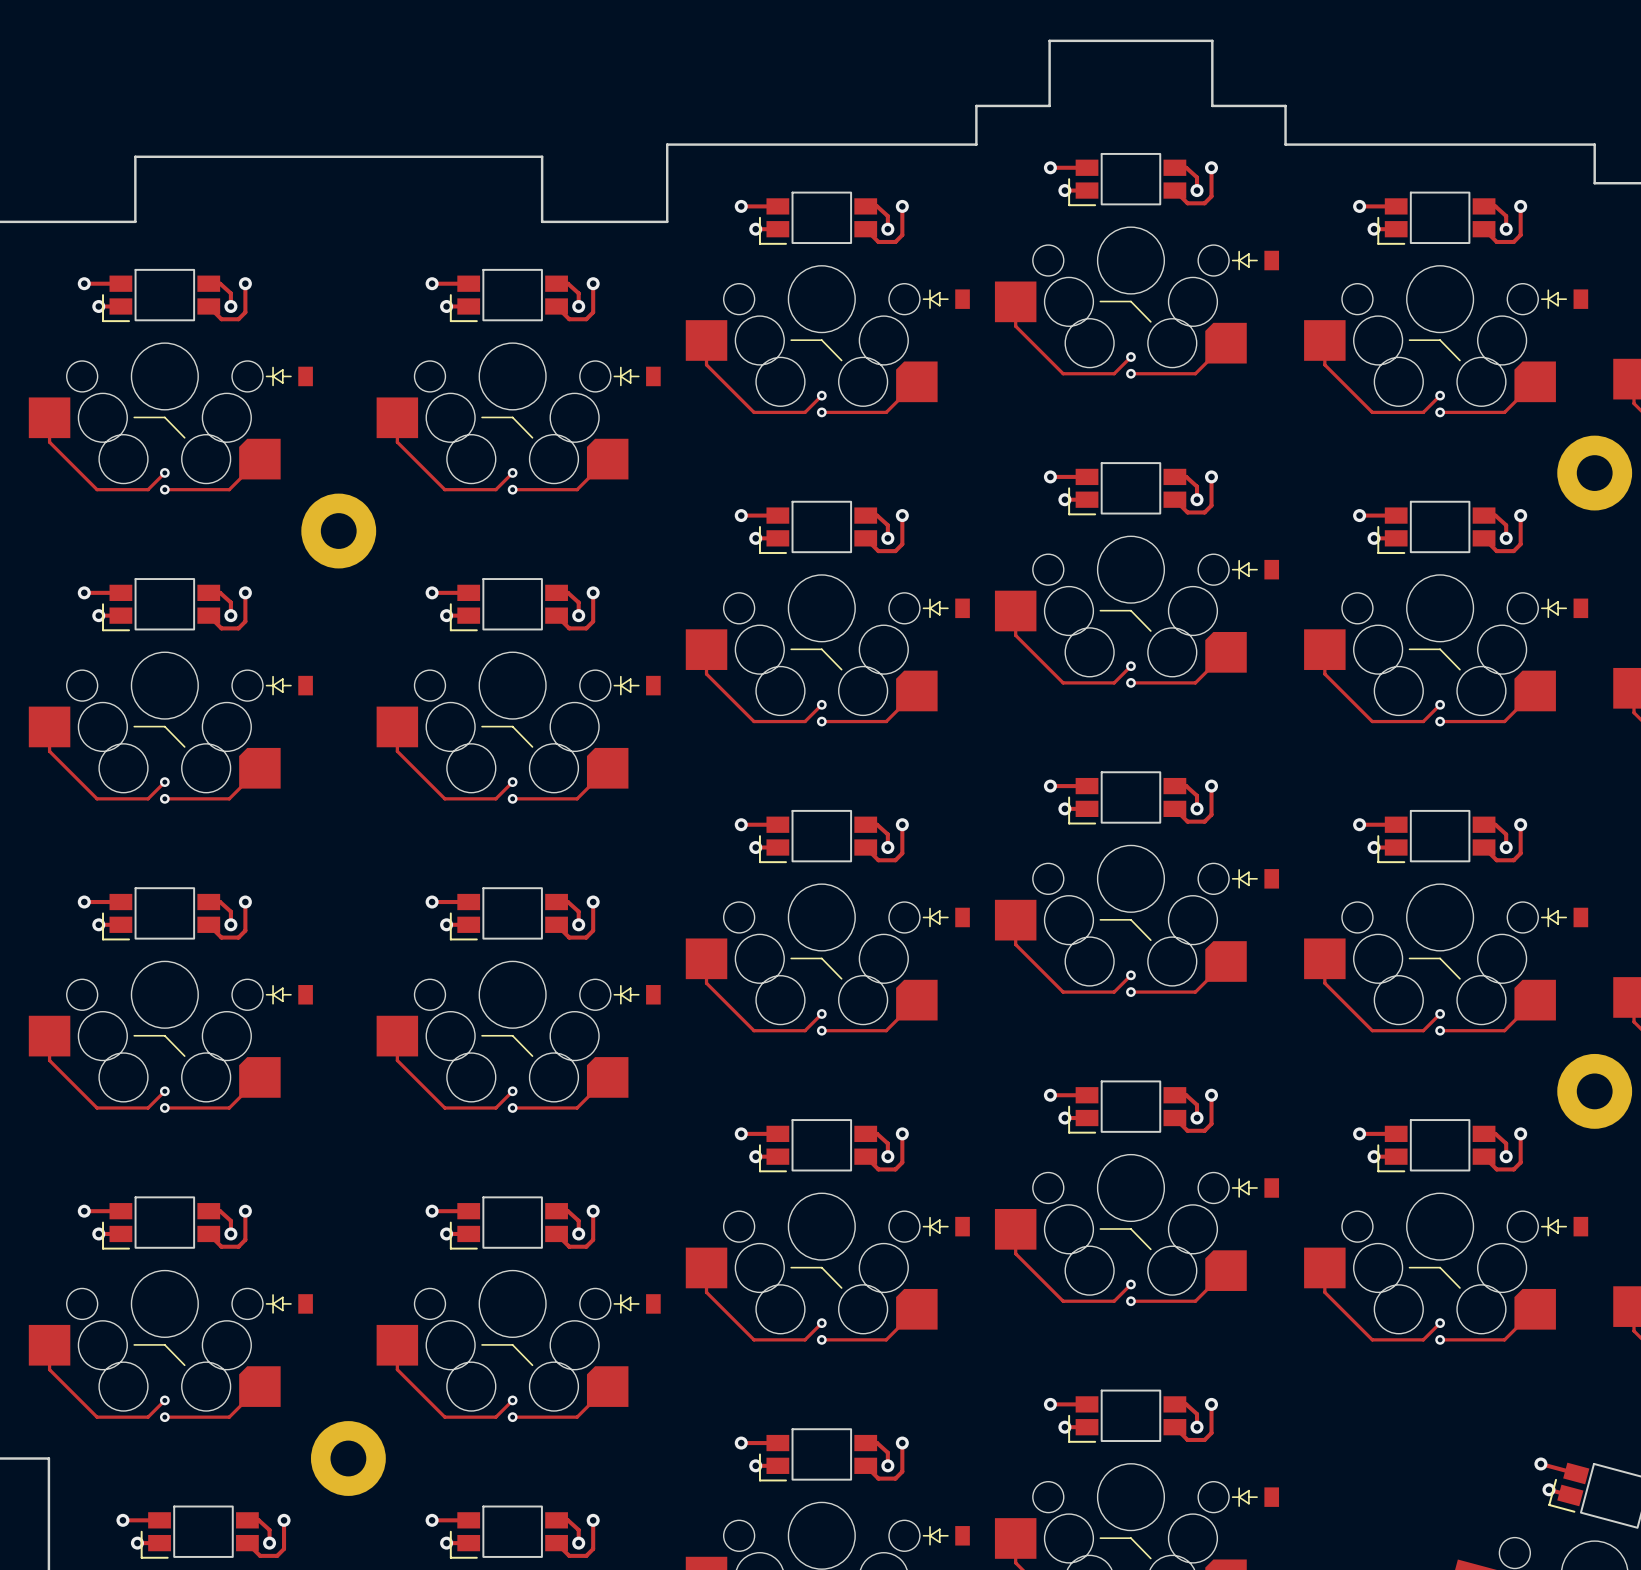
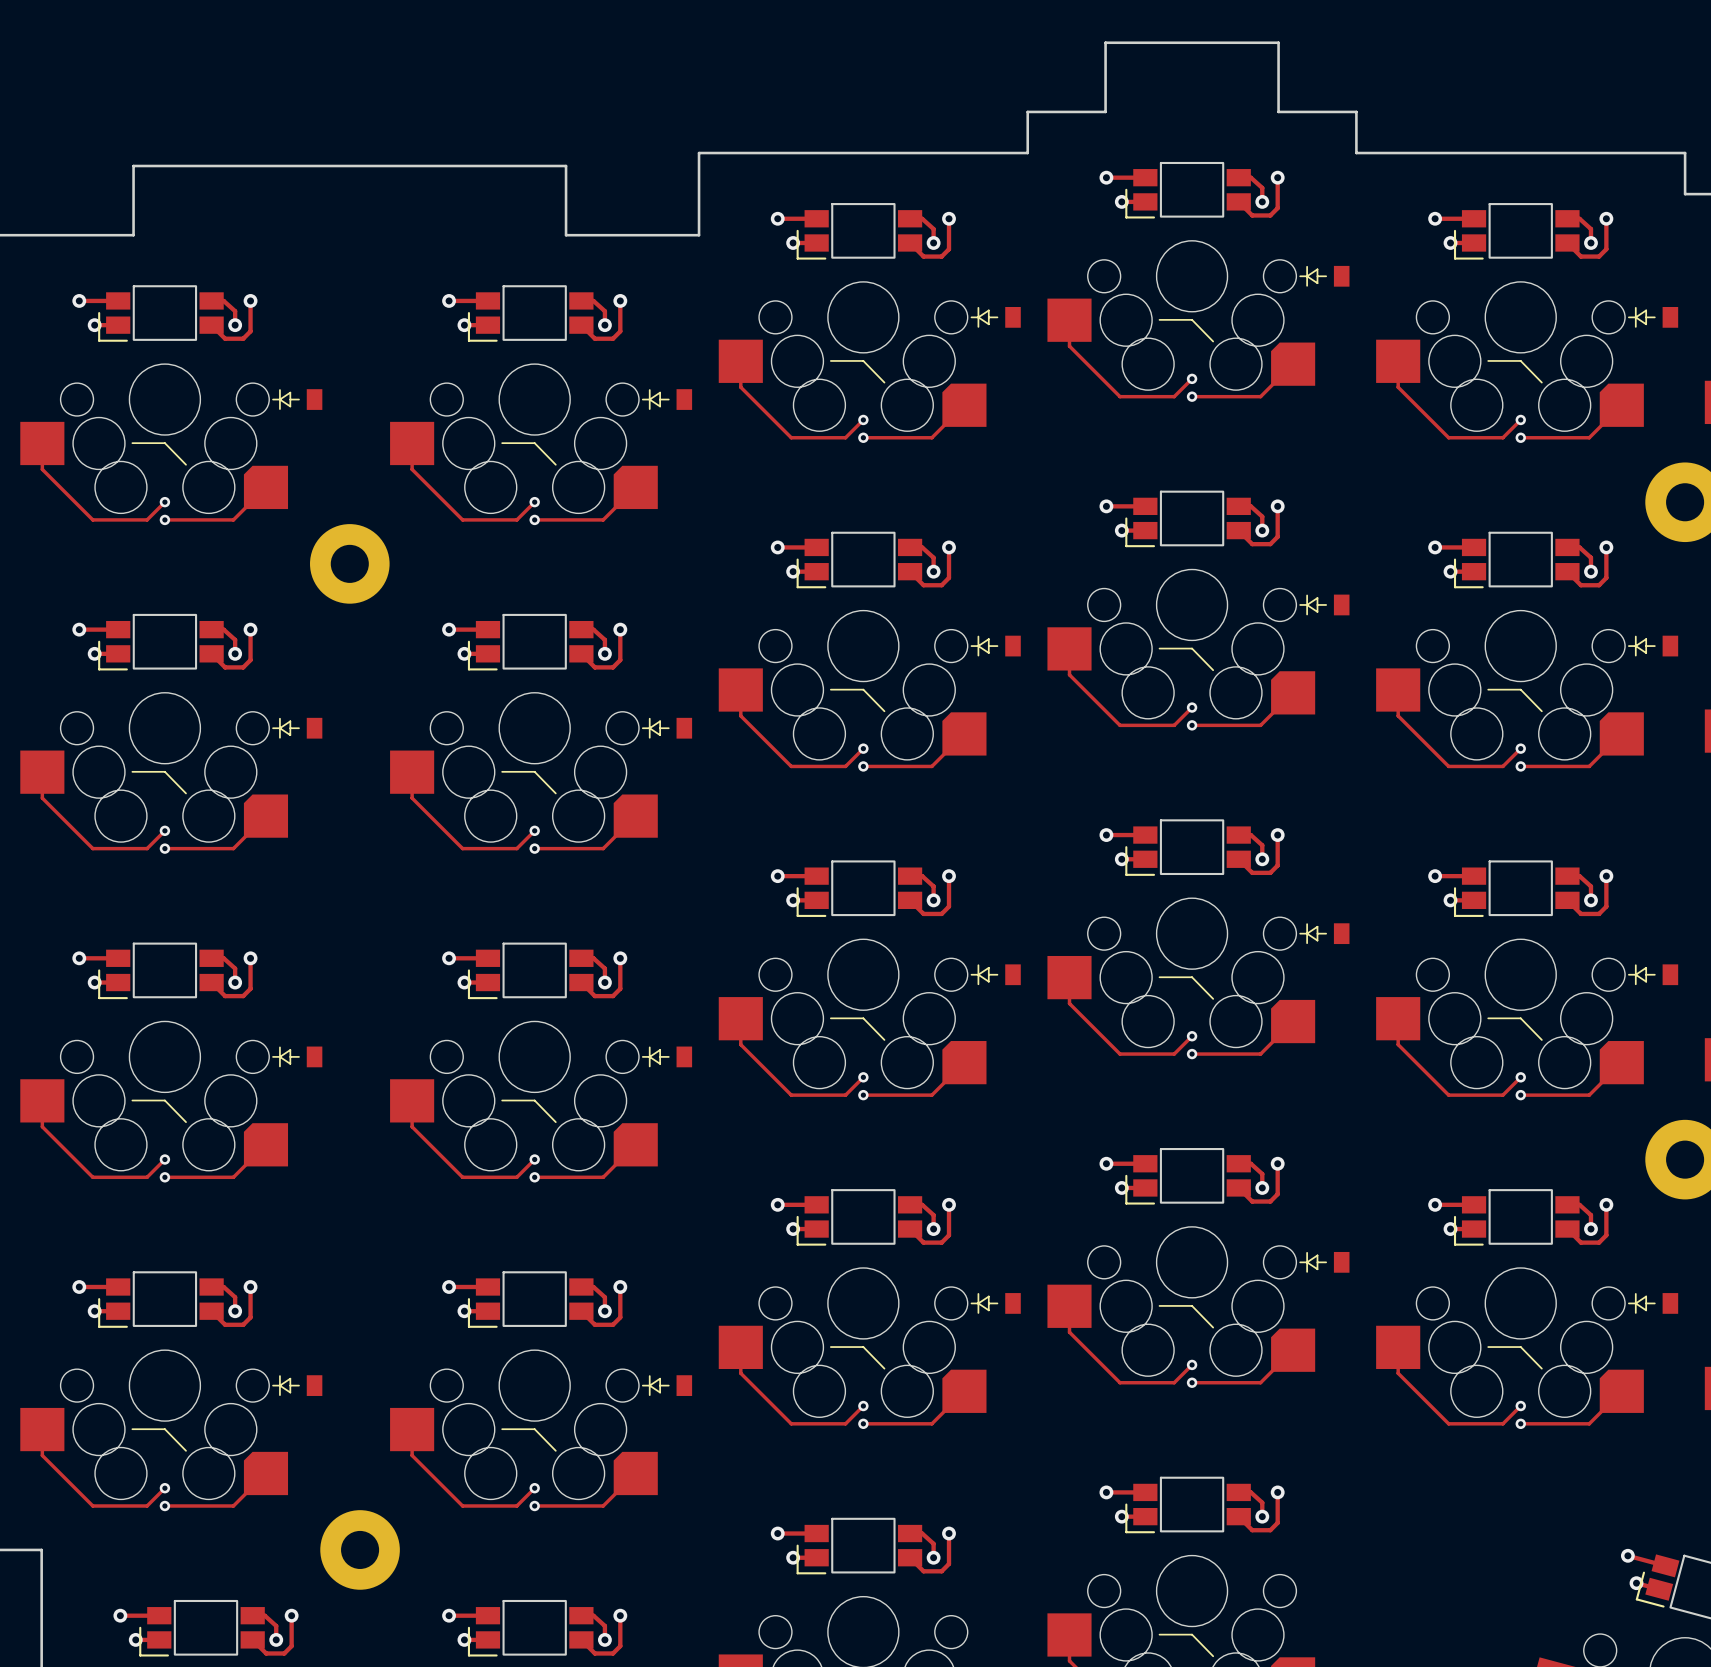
part: (1244, 1497) -> none
part: (935, 1535) -> none

